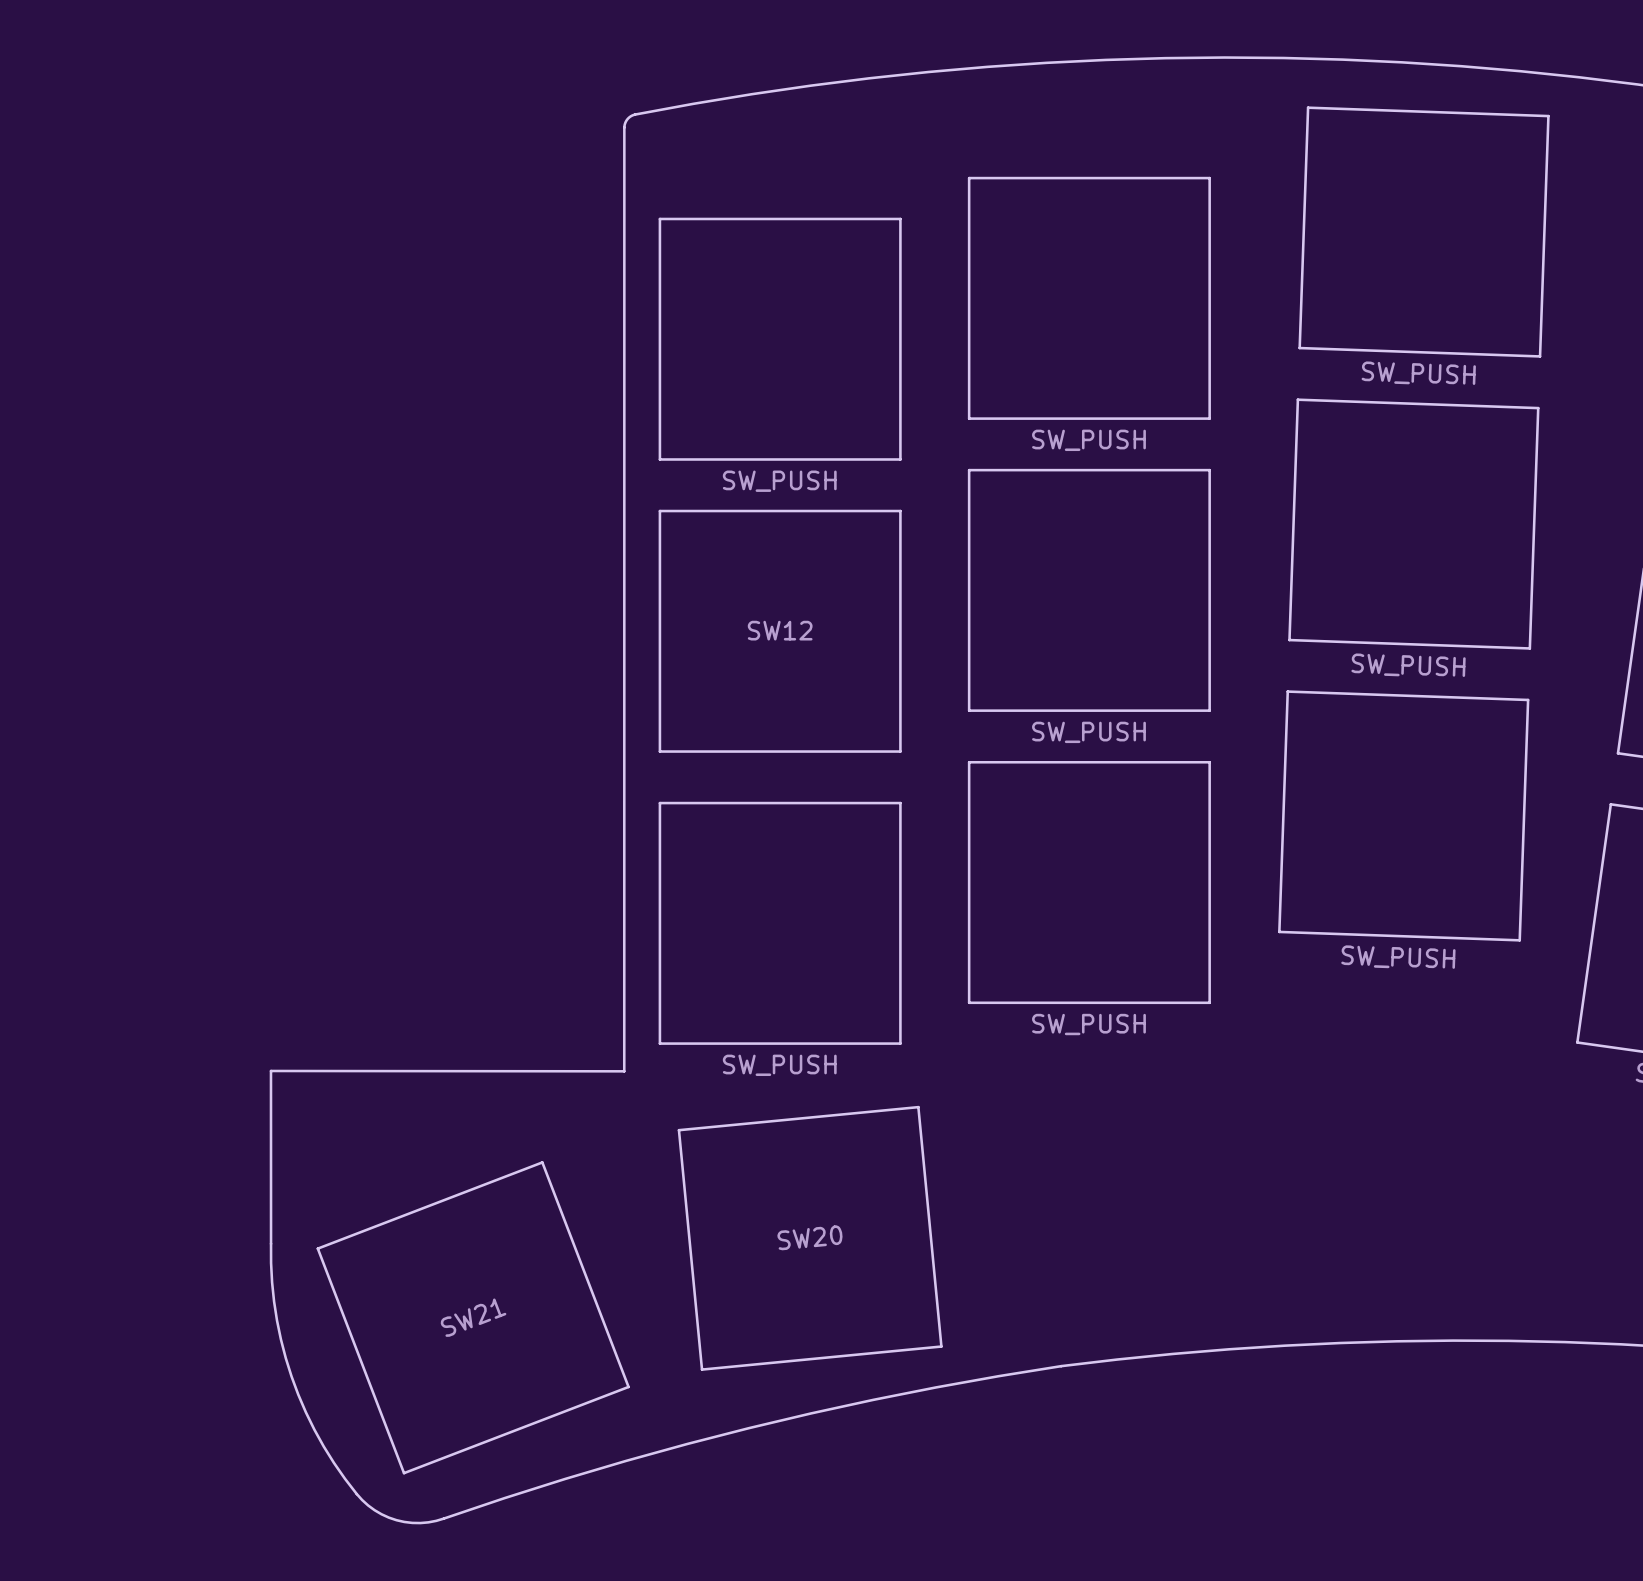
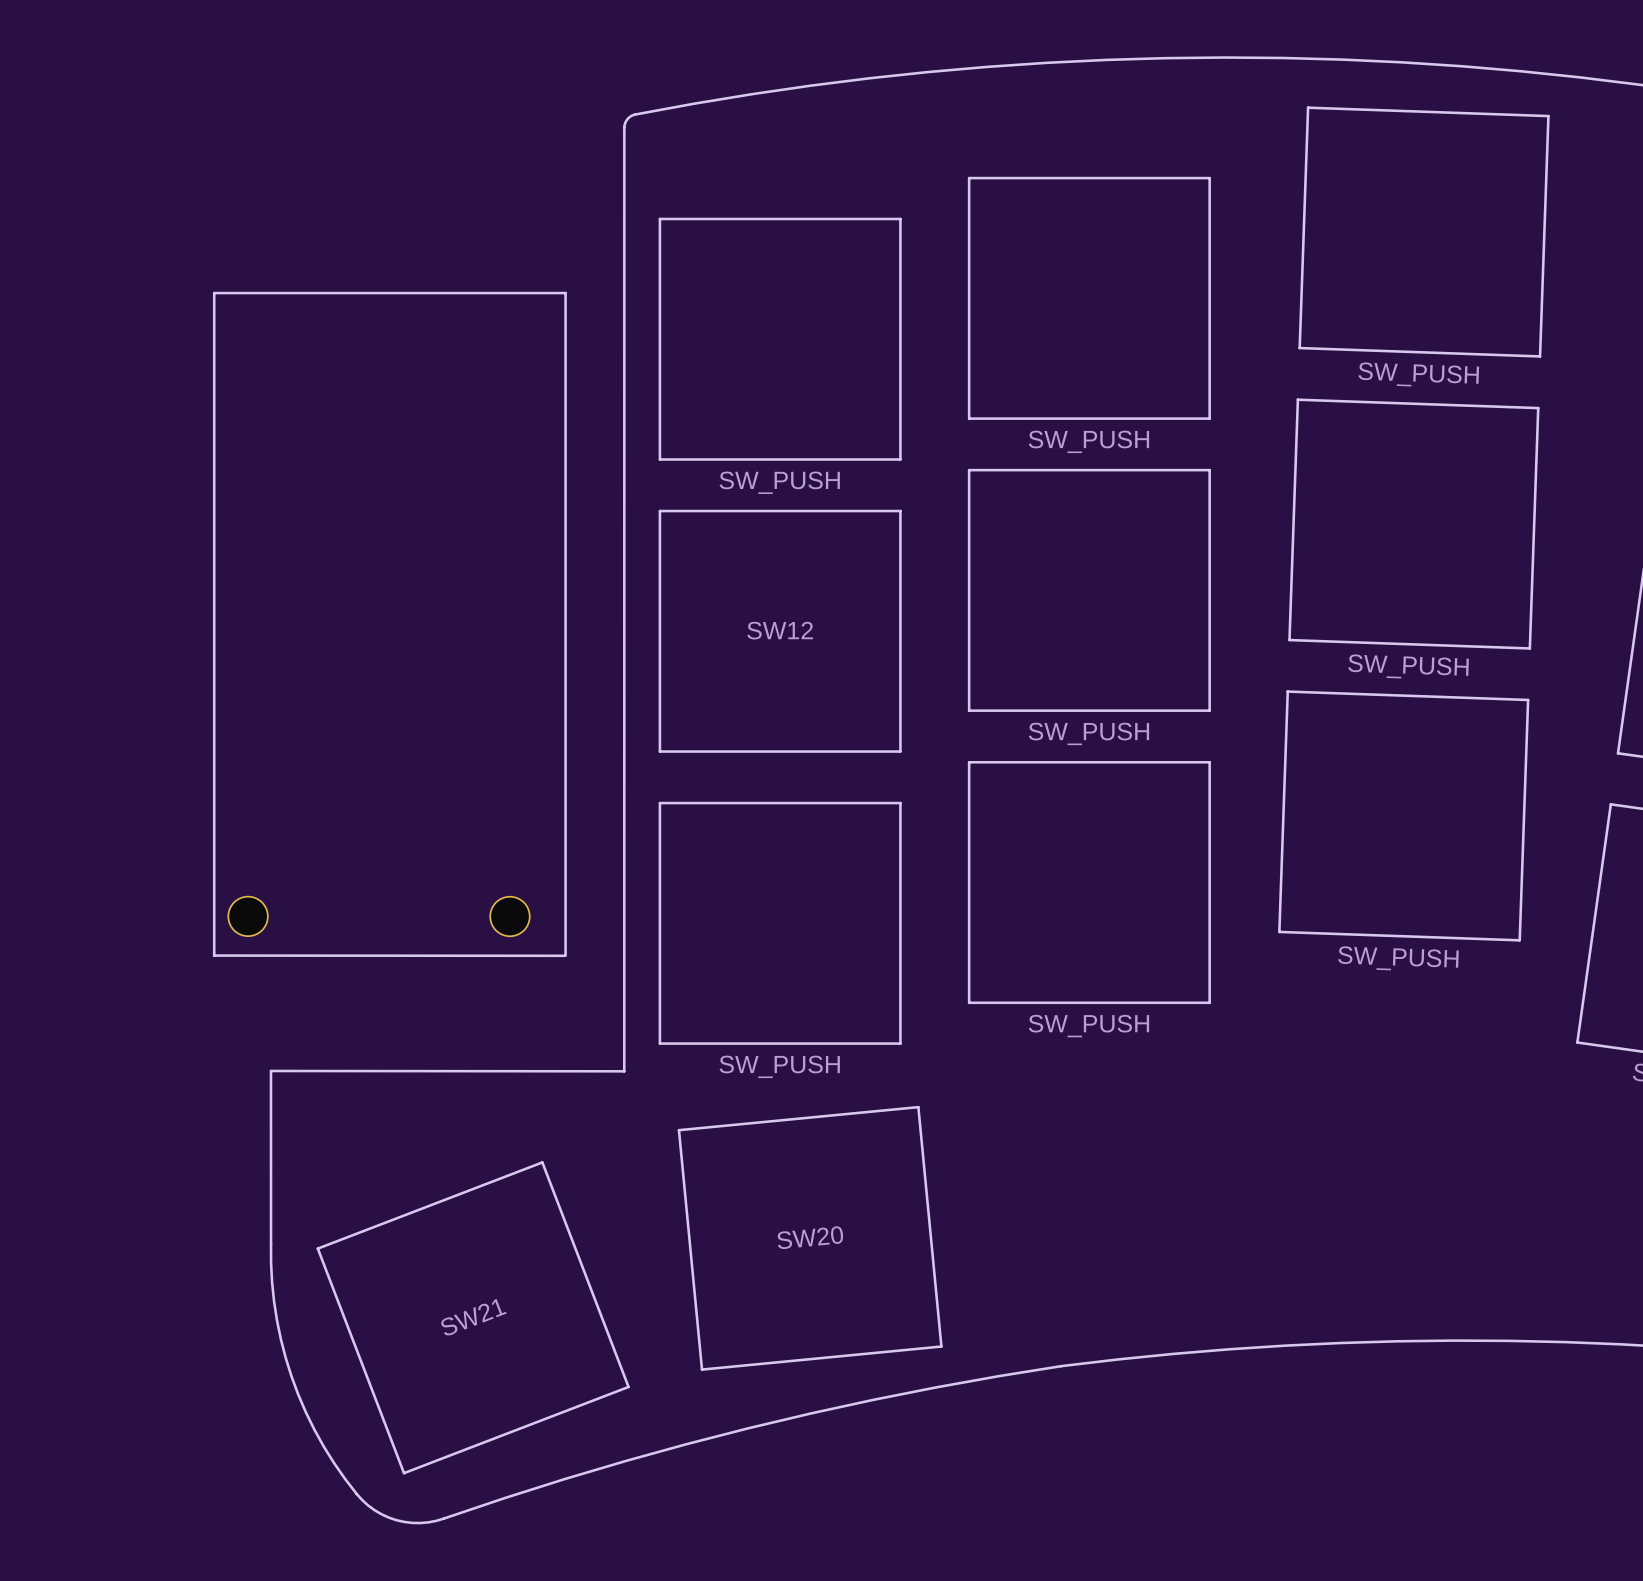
part: none -> (248, 916)
part: none -> (509, 916)
board edge: none -> (565, 955) (565, 293) (214, 293) (214, 955) (564, 955)

